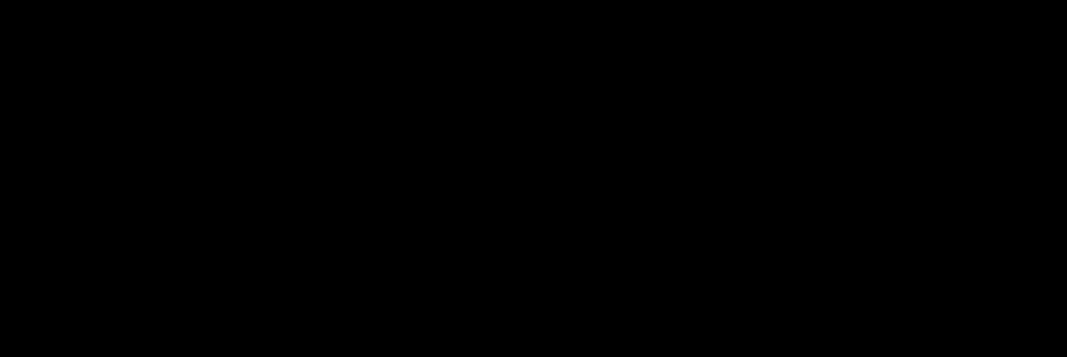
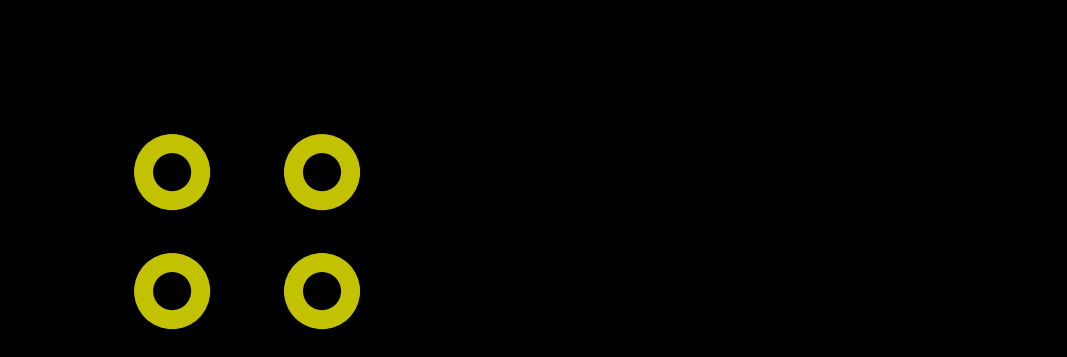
part: none -> (172, 231)
part: none -> (322, 231)

